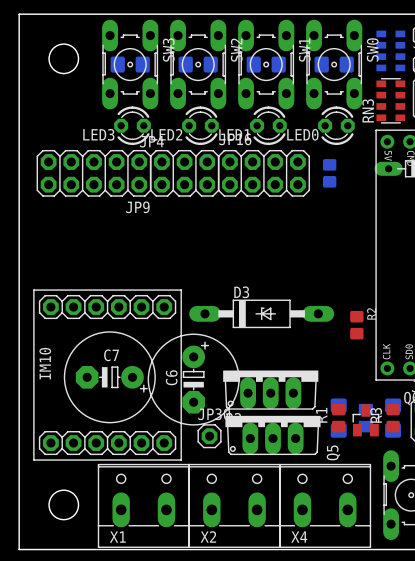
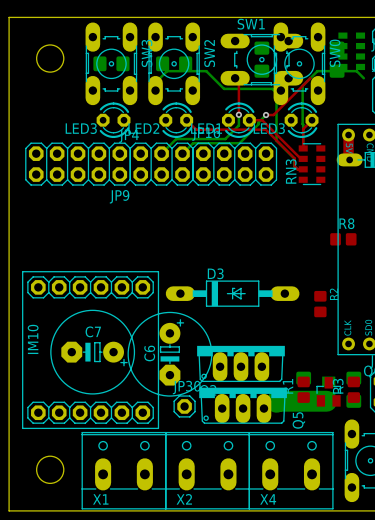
part: none -> (261, 59)
part: none -> (337, 59)
SW1 rotation: 0° (266, 64) -> 90° counterclockwise (261, 59)
part: (266, 64) -> none
part: (334, 64) -> none
bottom track: none -> (159, 78) (167, 71) (206, 71) (224, 88) (272, 88) (276, 93) (276, 140) (294, 158) (294, 166) (297, 169) (303, 169)
top track: none -> (235, 78) (238, 82) (238, 114)
top track: none -> (310, 78) (273, 115) (266, 115)
bottom track: none -> (363, 78) (356, 71) (317, 71) (302, 85) (303, 148)
RN3 position: (390, 100) -> (312, 164)
bottom track: none -> (238, 114) (238, 125) (225, 139) (176, 139) (161, 153)
via: none -> (238, 114)
bottom track: none -> (266, 115) (239, 143) (193, 143) (182, 153)
via: none -> (266, 115)
top track: none -> (186, 120) (196, 129) (265, 129) (294, 158) (294, 166) (297, 169) (303, 169)
top track: none -> (249, 120) (262, 120) (300, 158) (303, 158)
top track: none -> (312, 120) (303, 129) (303, 148)
LED0 name: LED0 (302, 134) -> LED3 (269, 128)
top track: none -> (348, 135) (349, 159)
R8 side: bottom (329, 173) -> top (343, 239)
bottom track: none -> (326, 401) (276, 402)

